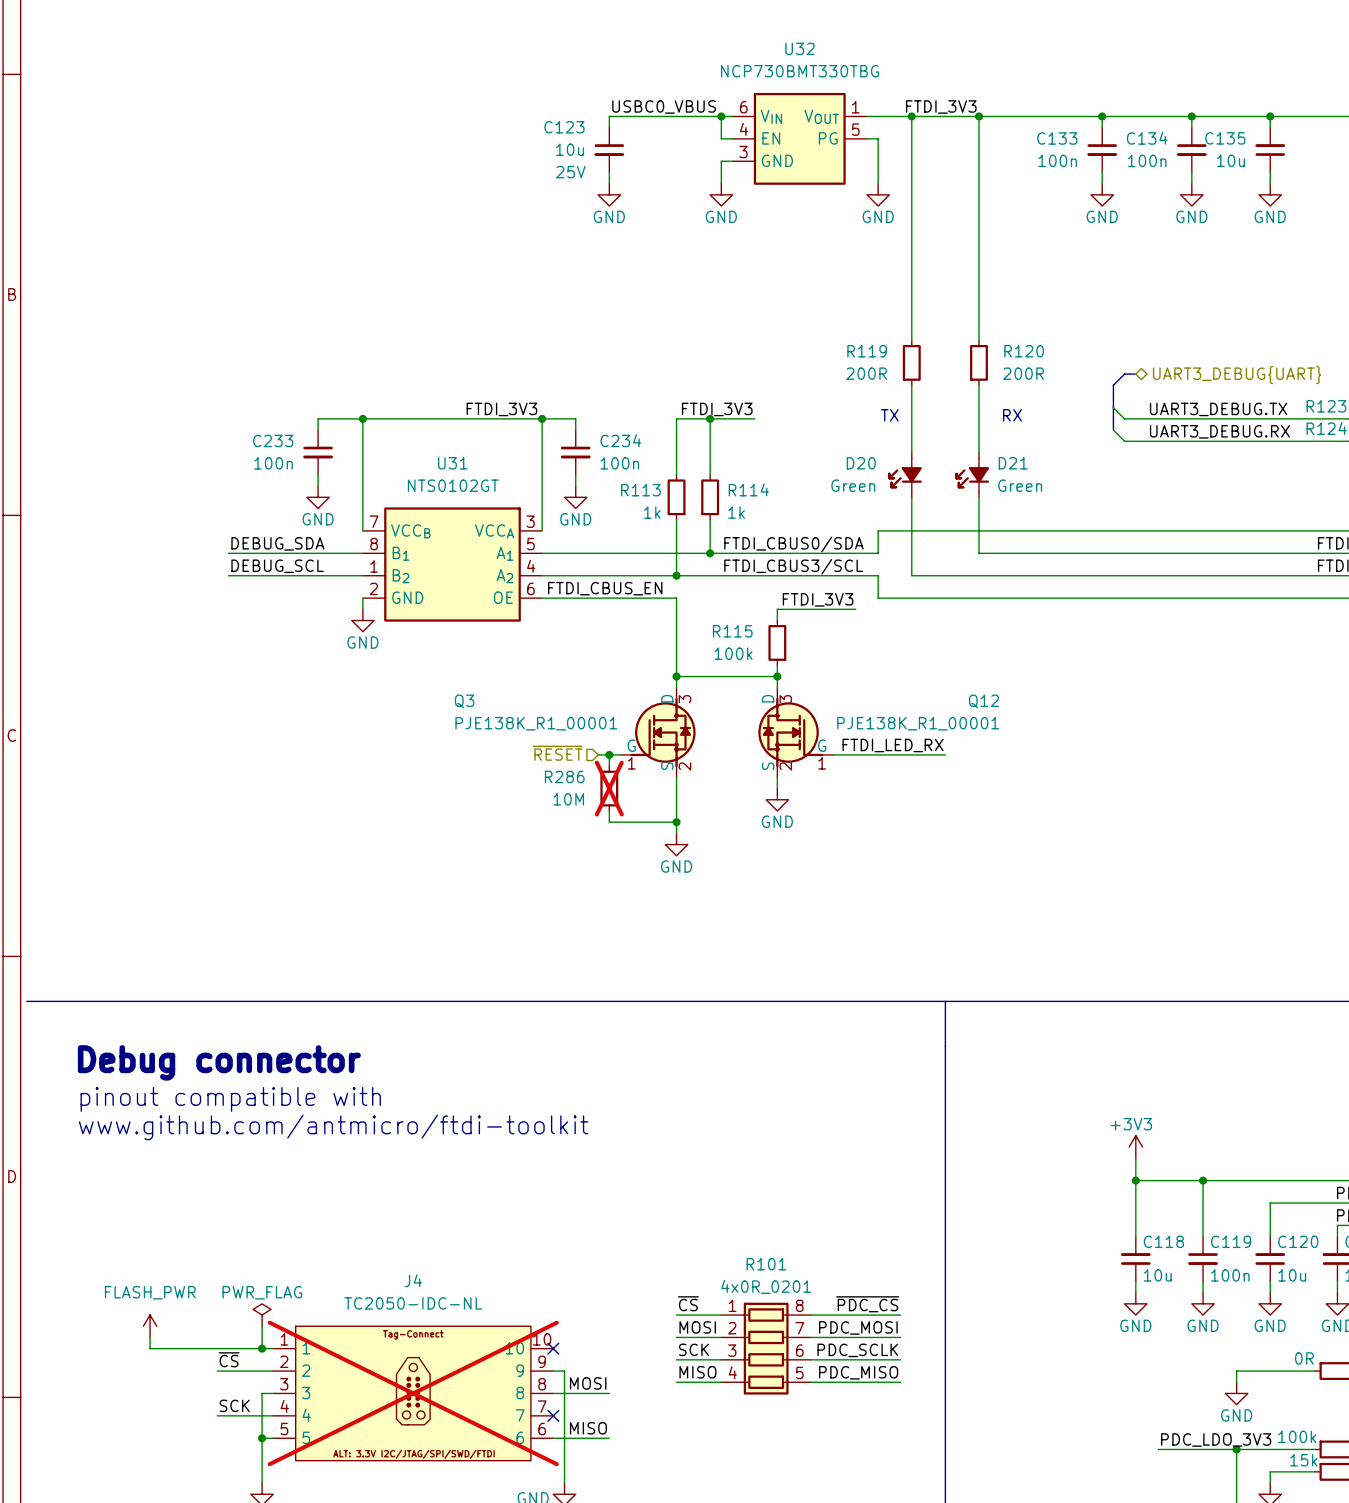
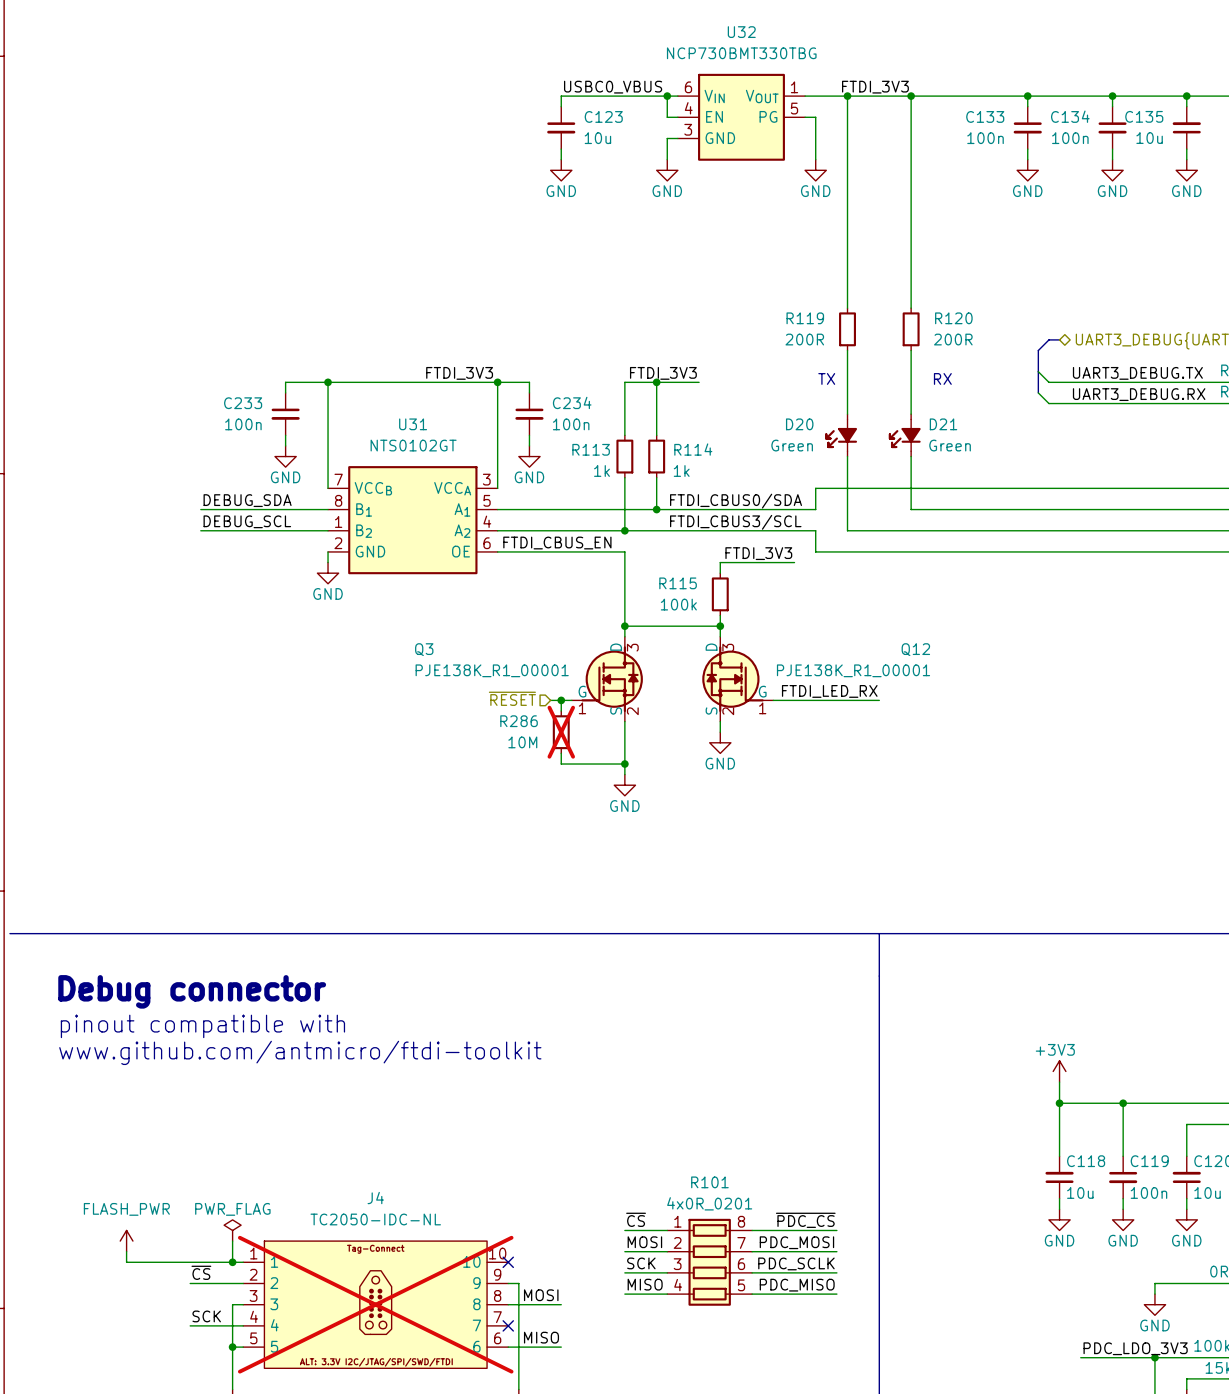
C123 name position: C123 (564, 127) -> C123 (603, 116)
C123 text position: 10u (570, 149) -> 10u (597, 138)
C123 text: 25V (570, 172) -> none

